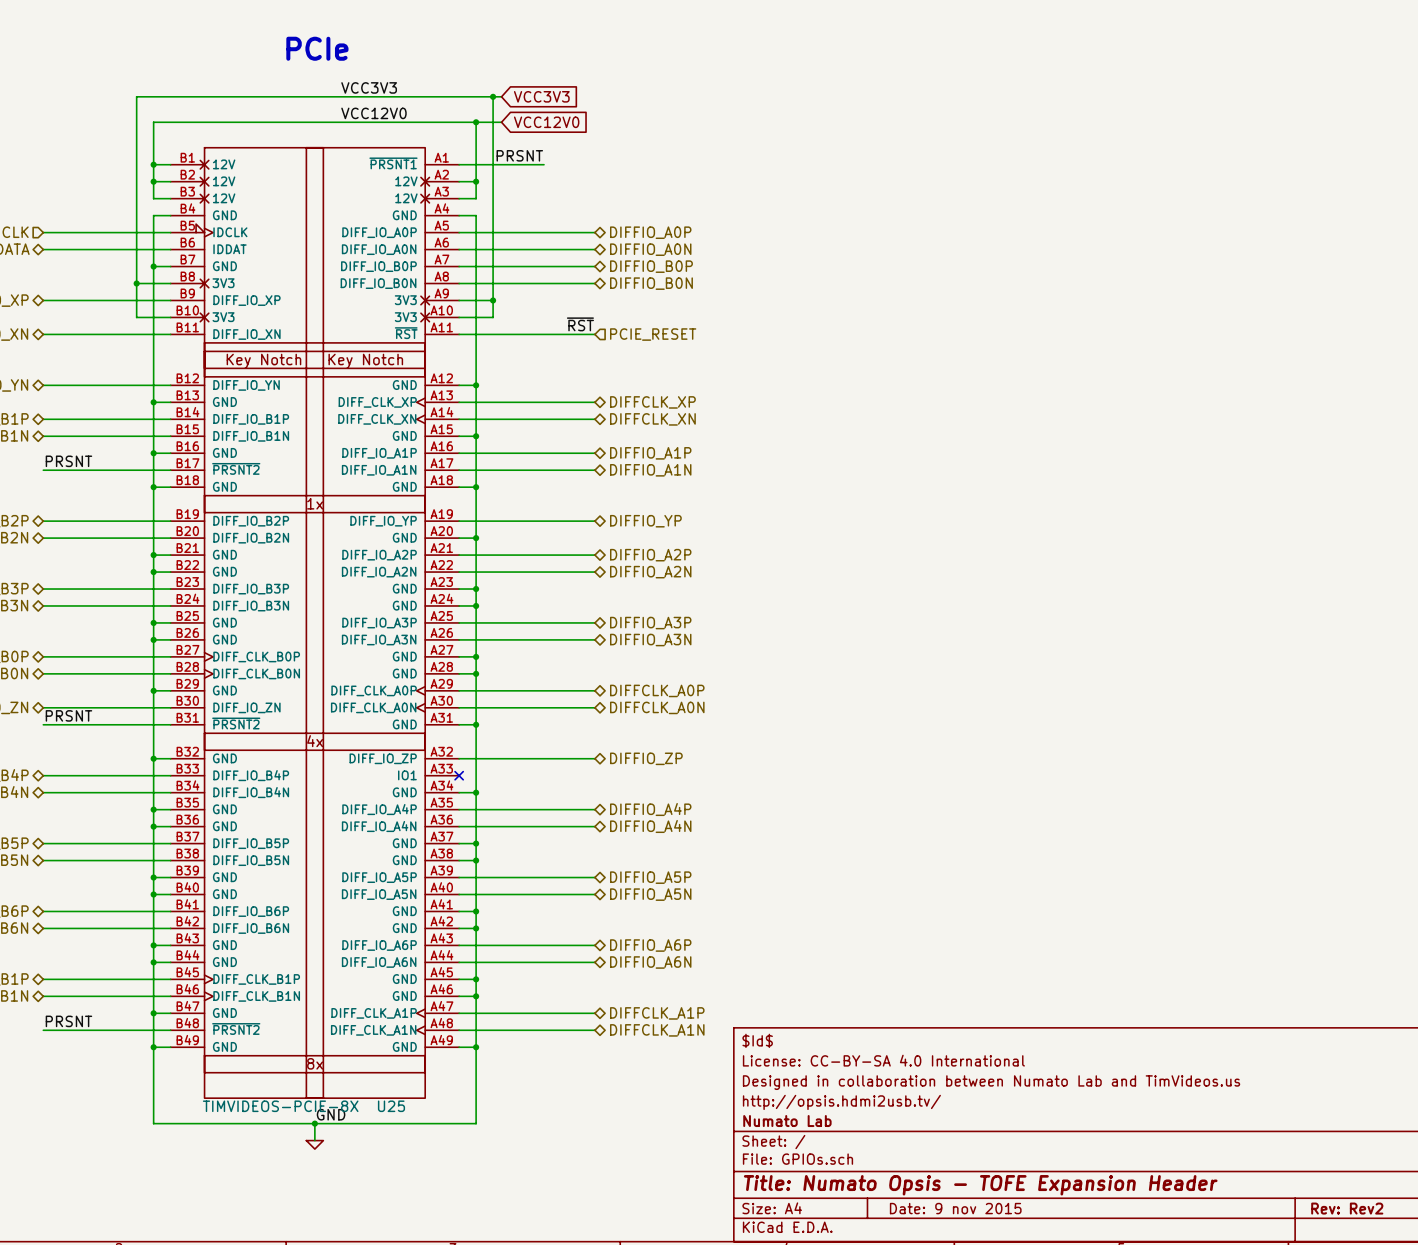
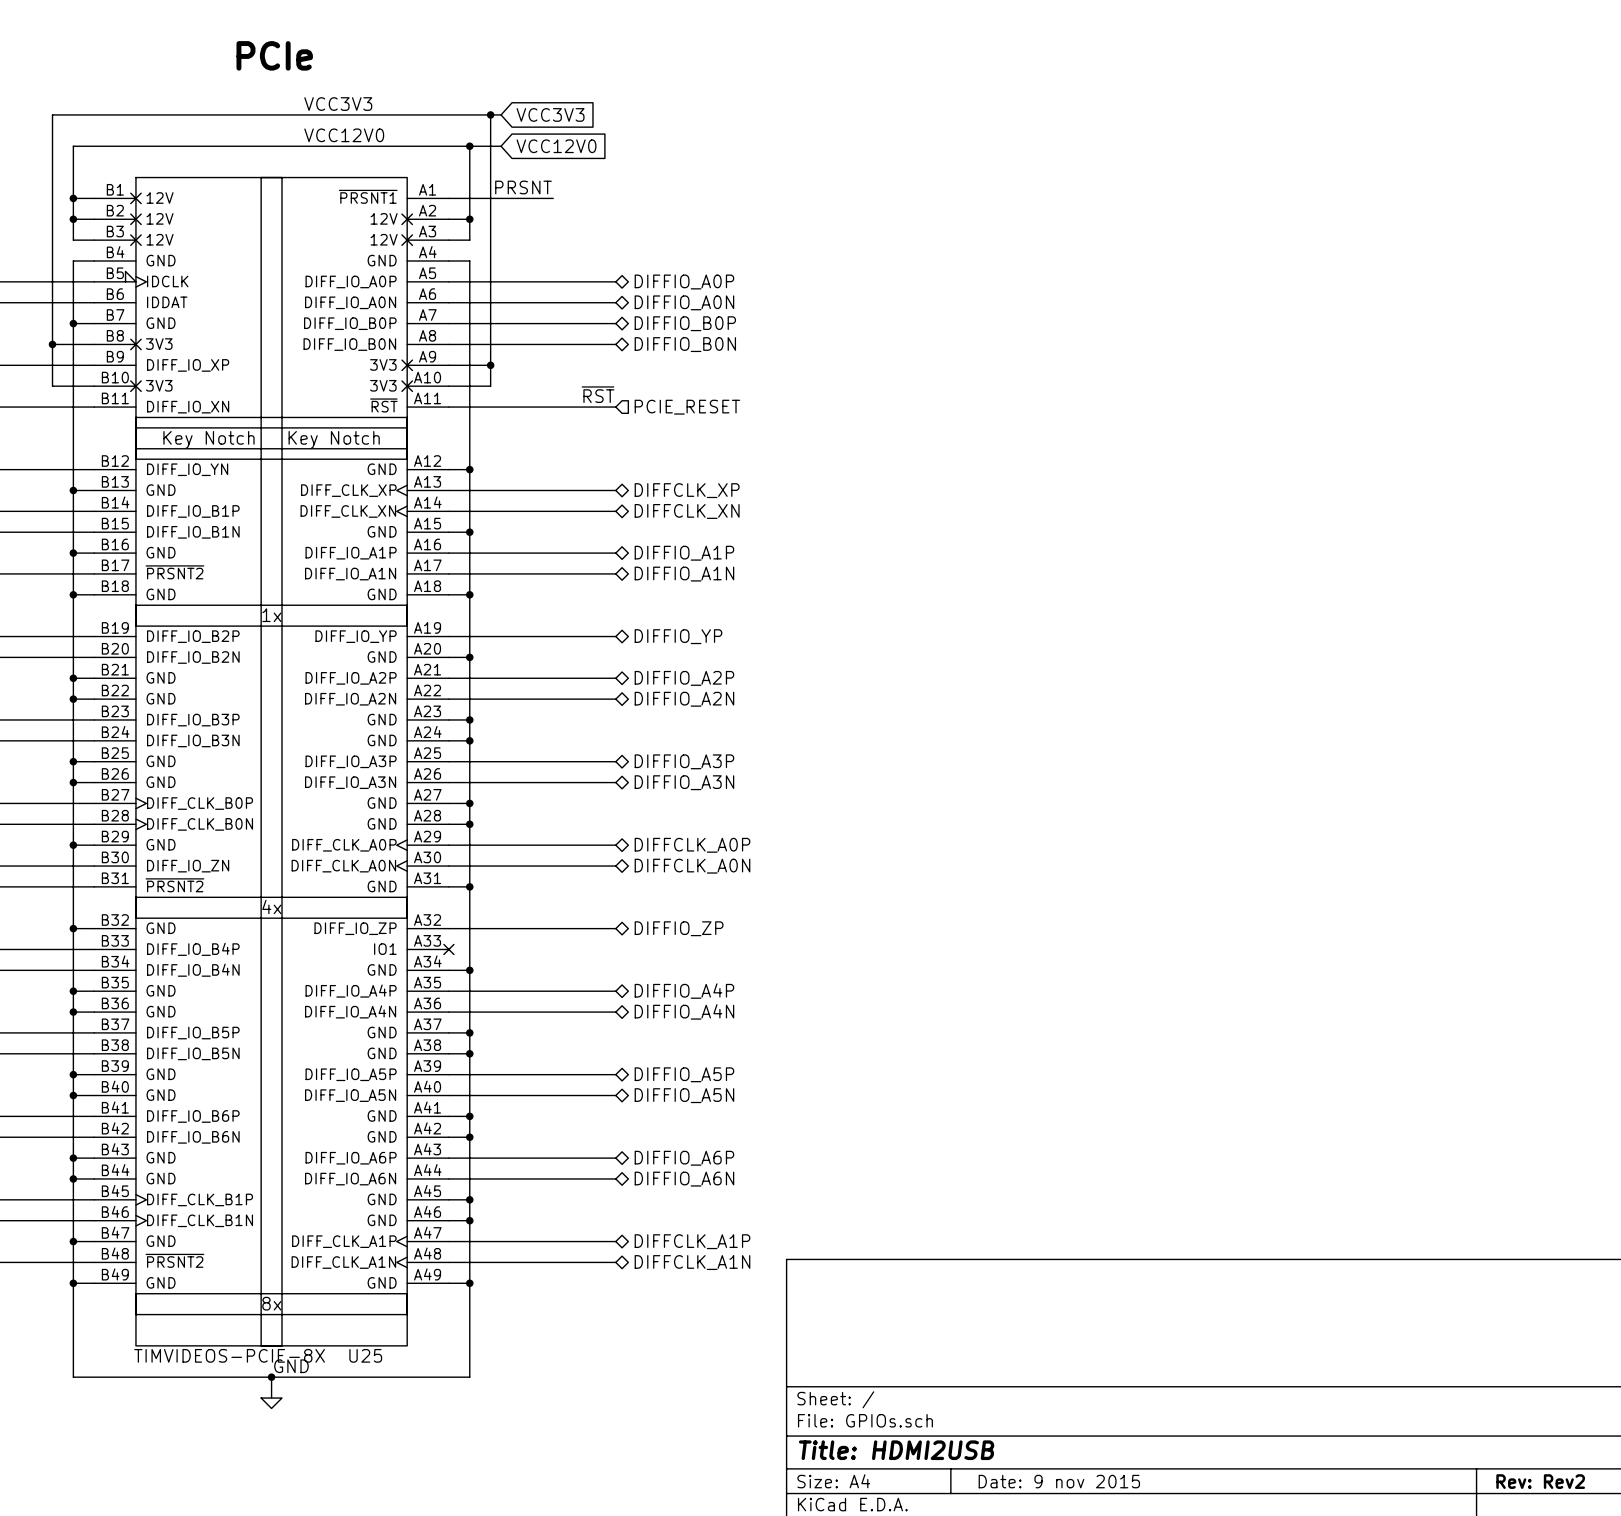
title block: $Id$ (757, 1040) -> none
title block: License: CC-BY-SA 4.0 International (883, 1060) -> none
title block: Designed in collaboration between Numato Lab and TimVideos.us (991, 1082) -> none
title block: http://opsis.hdmi2usb.tv/ (841, 1102) -> none
title block: Numato Lab (787, 1121) -> none
title block: Title: Numato Opsis - TOFE Expansion Header (980, 1185) -> Title: HDMI2USB (896, 1450)

